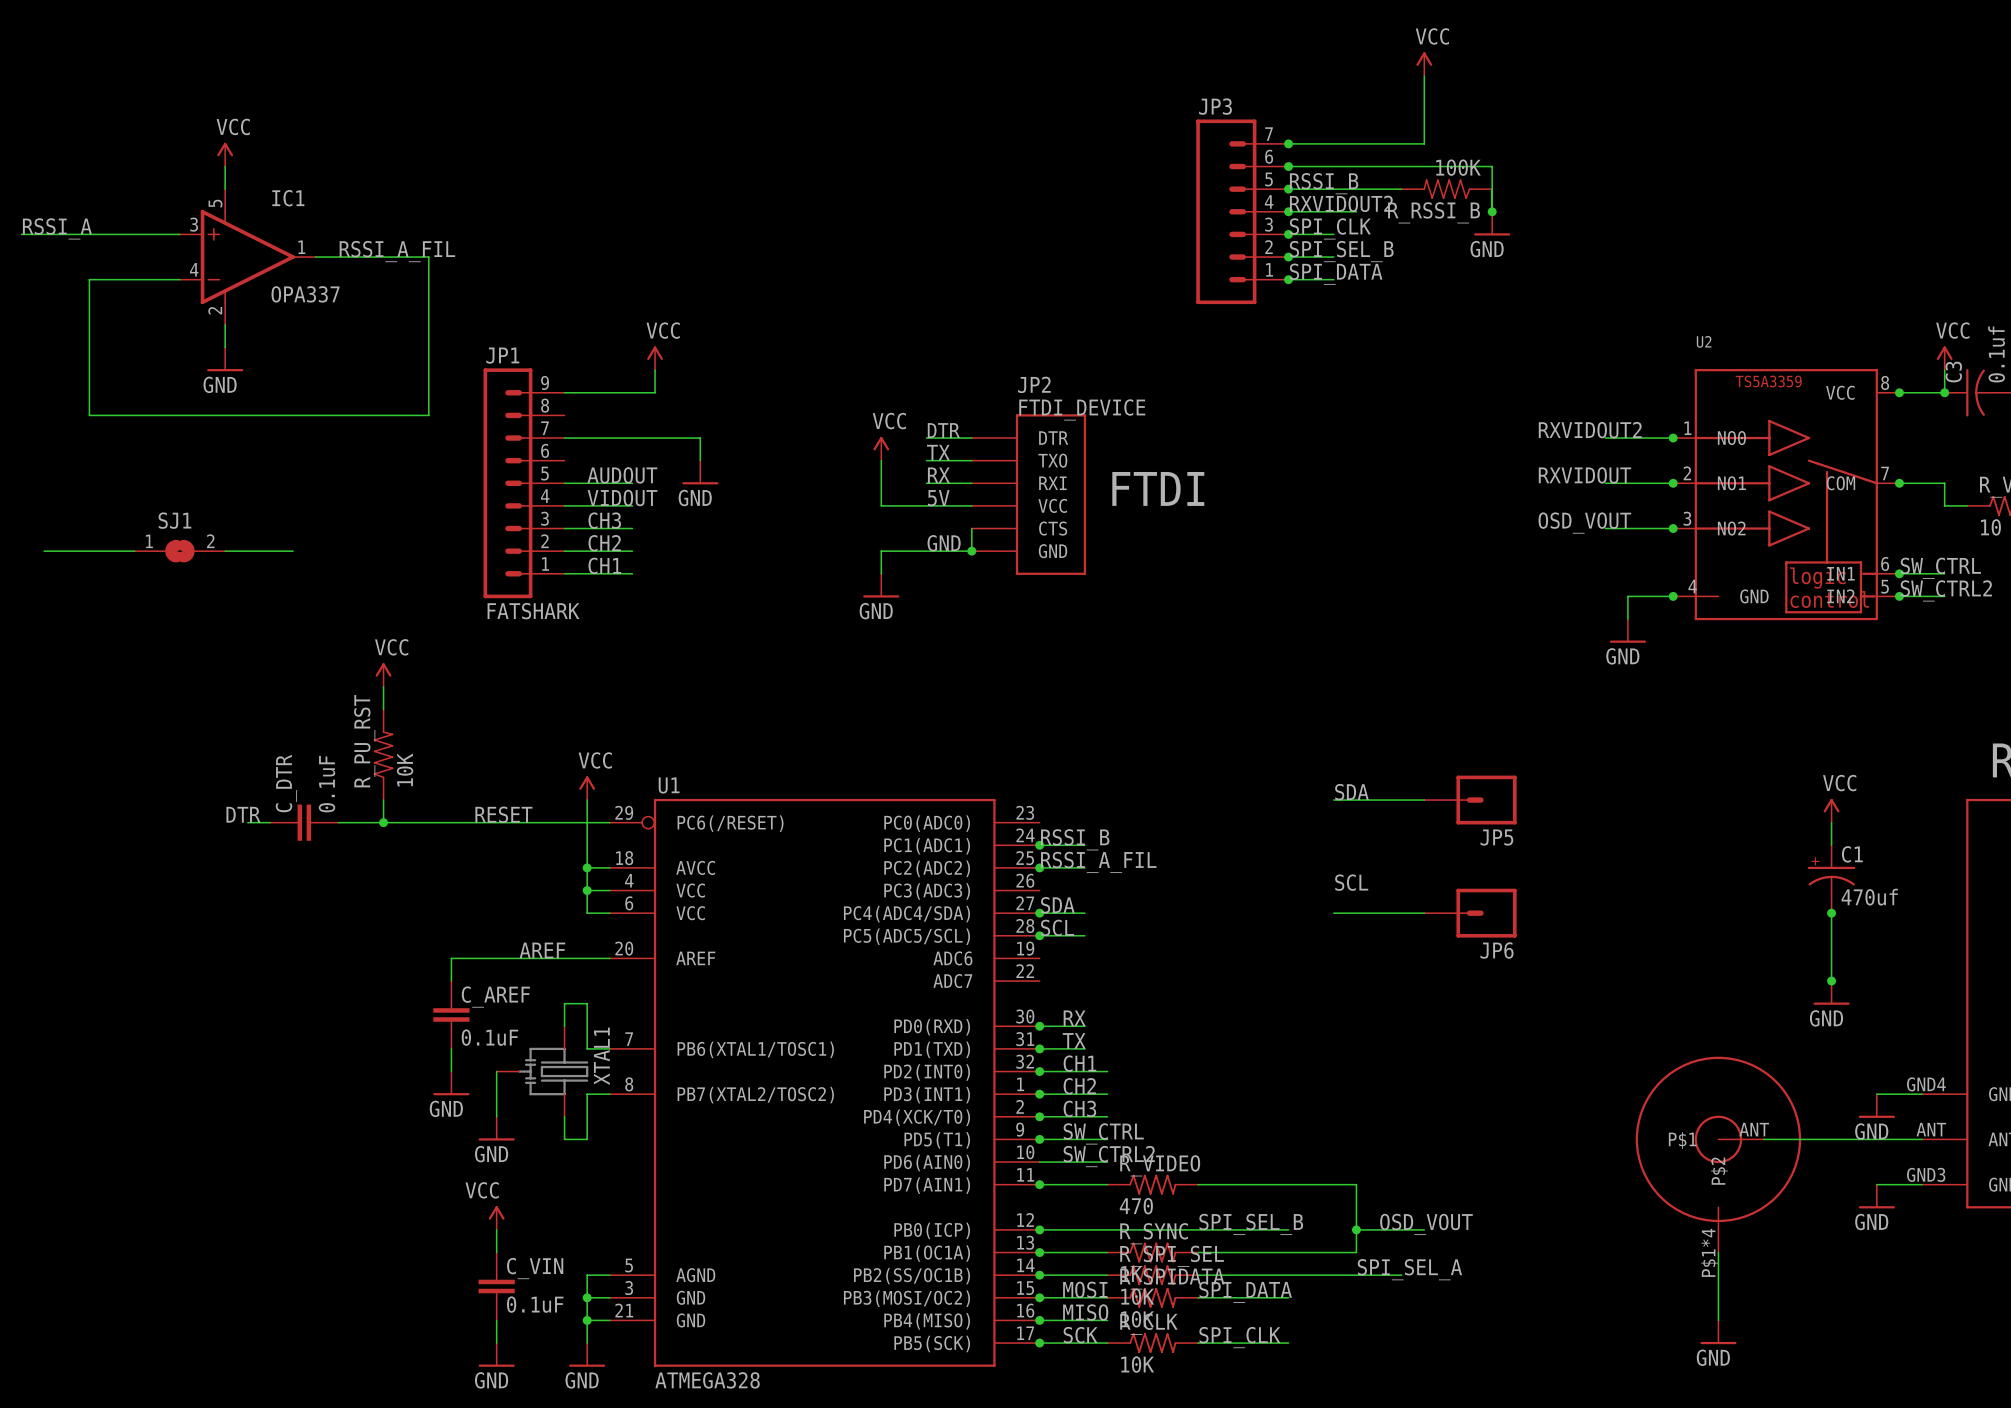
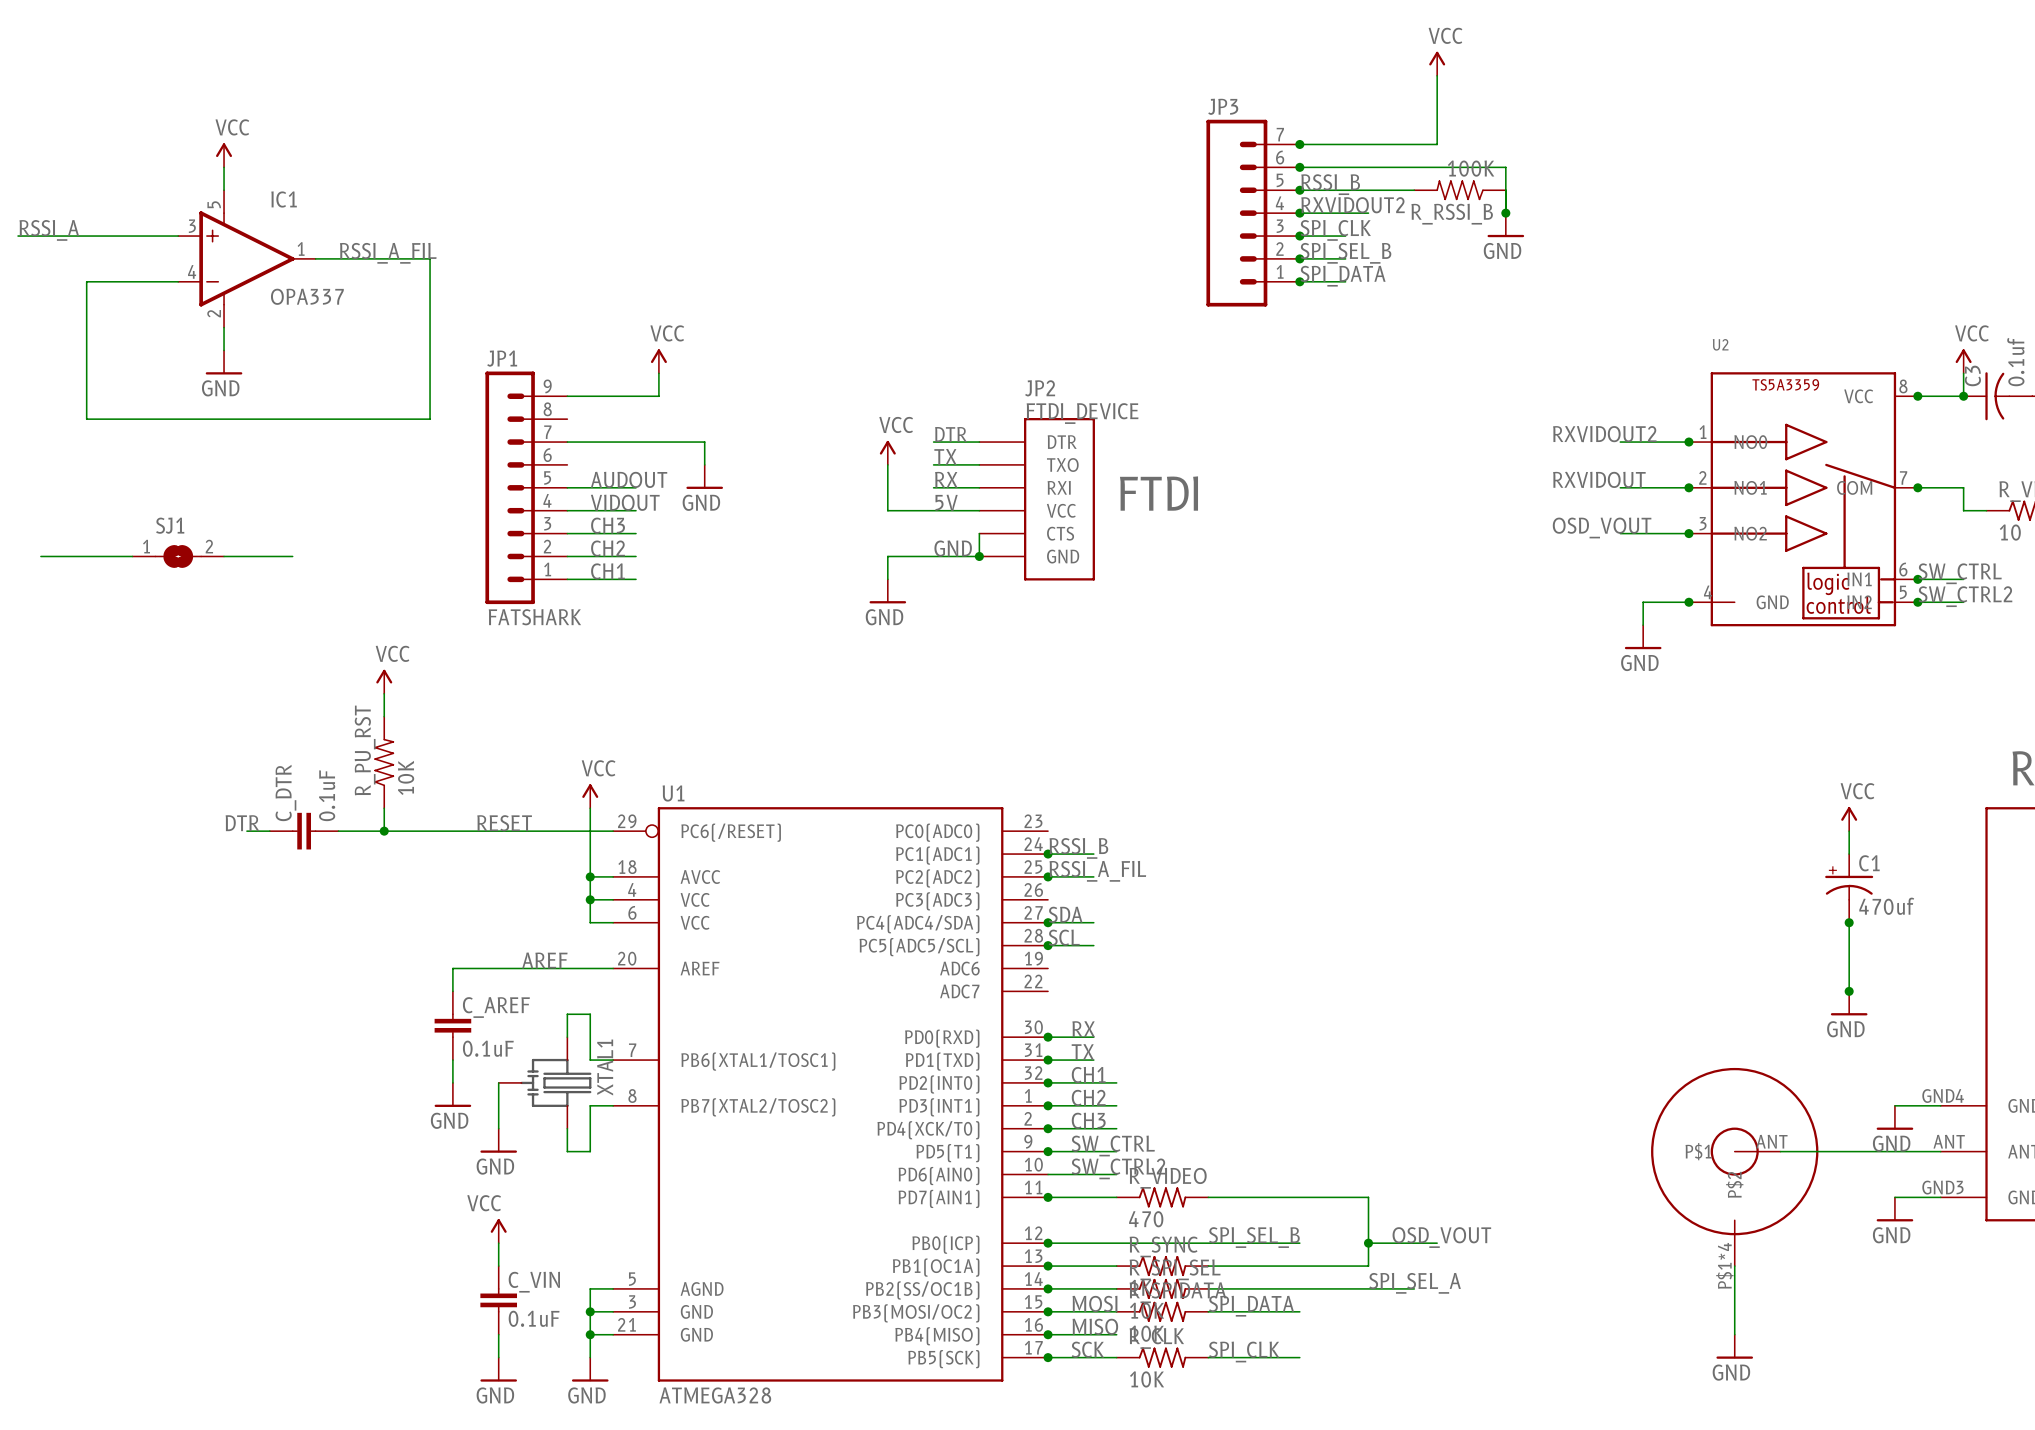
label: SDA (1351, 792) -> none
wire: (1333, 800) (1424, 800) -> none
JP5: (1470, 800) -> none
label: SCL (1351, 882) -> none
wire: (1333, 913) (1424, 913) -> none
JP6: (1470, 913) -> none

